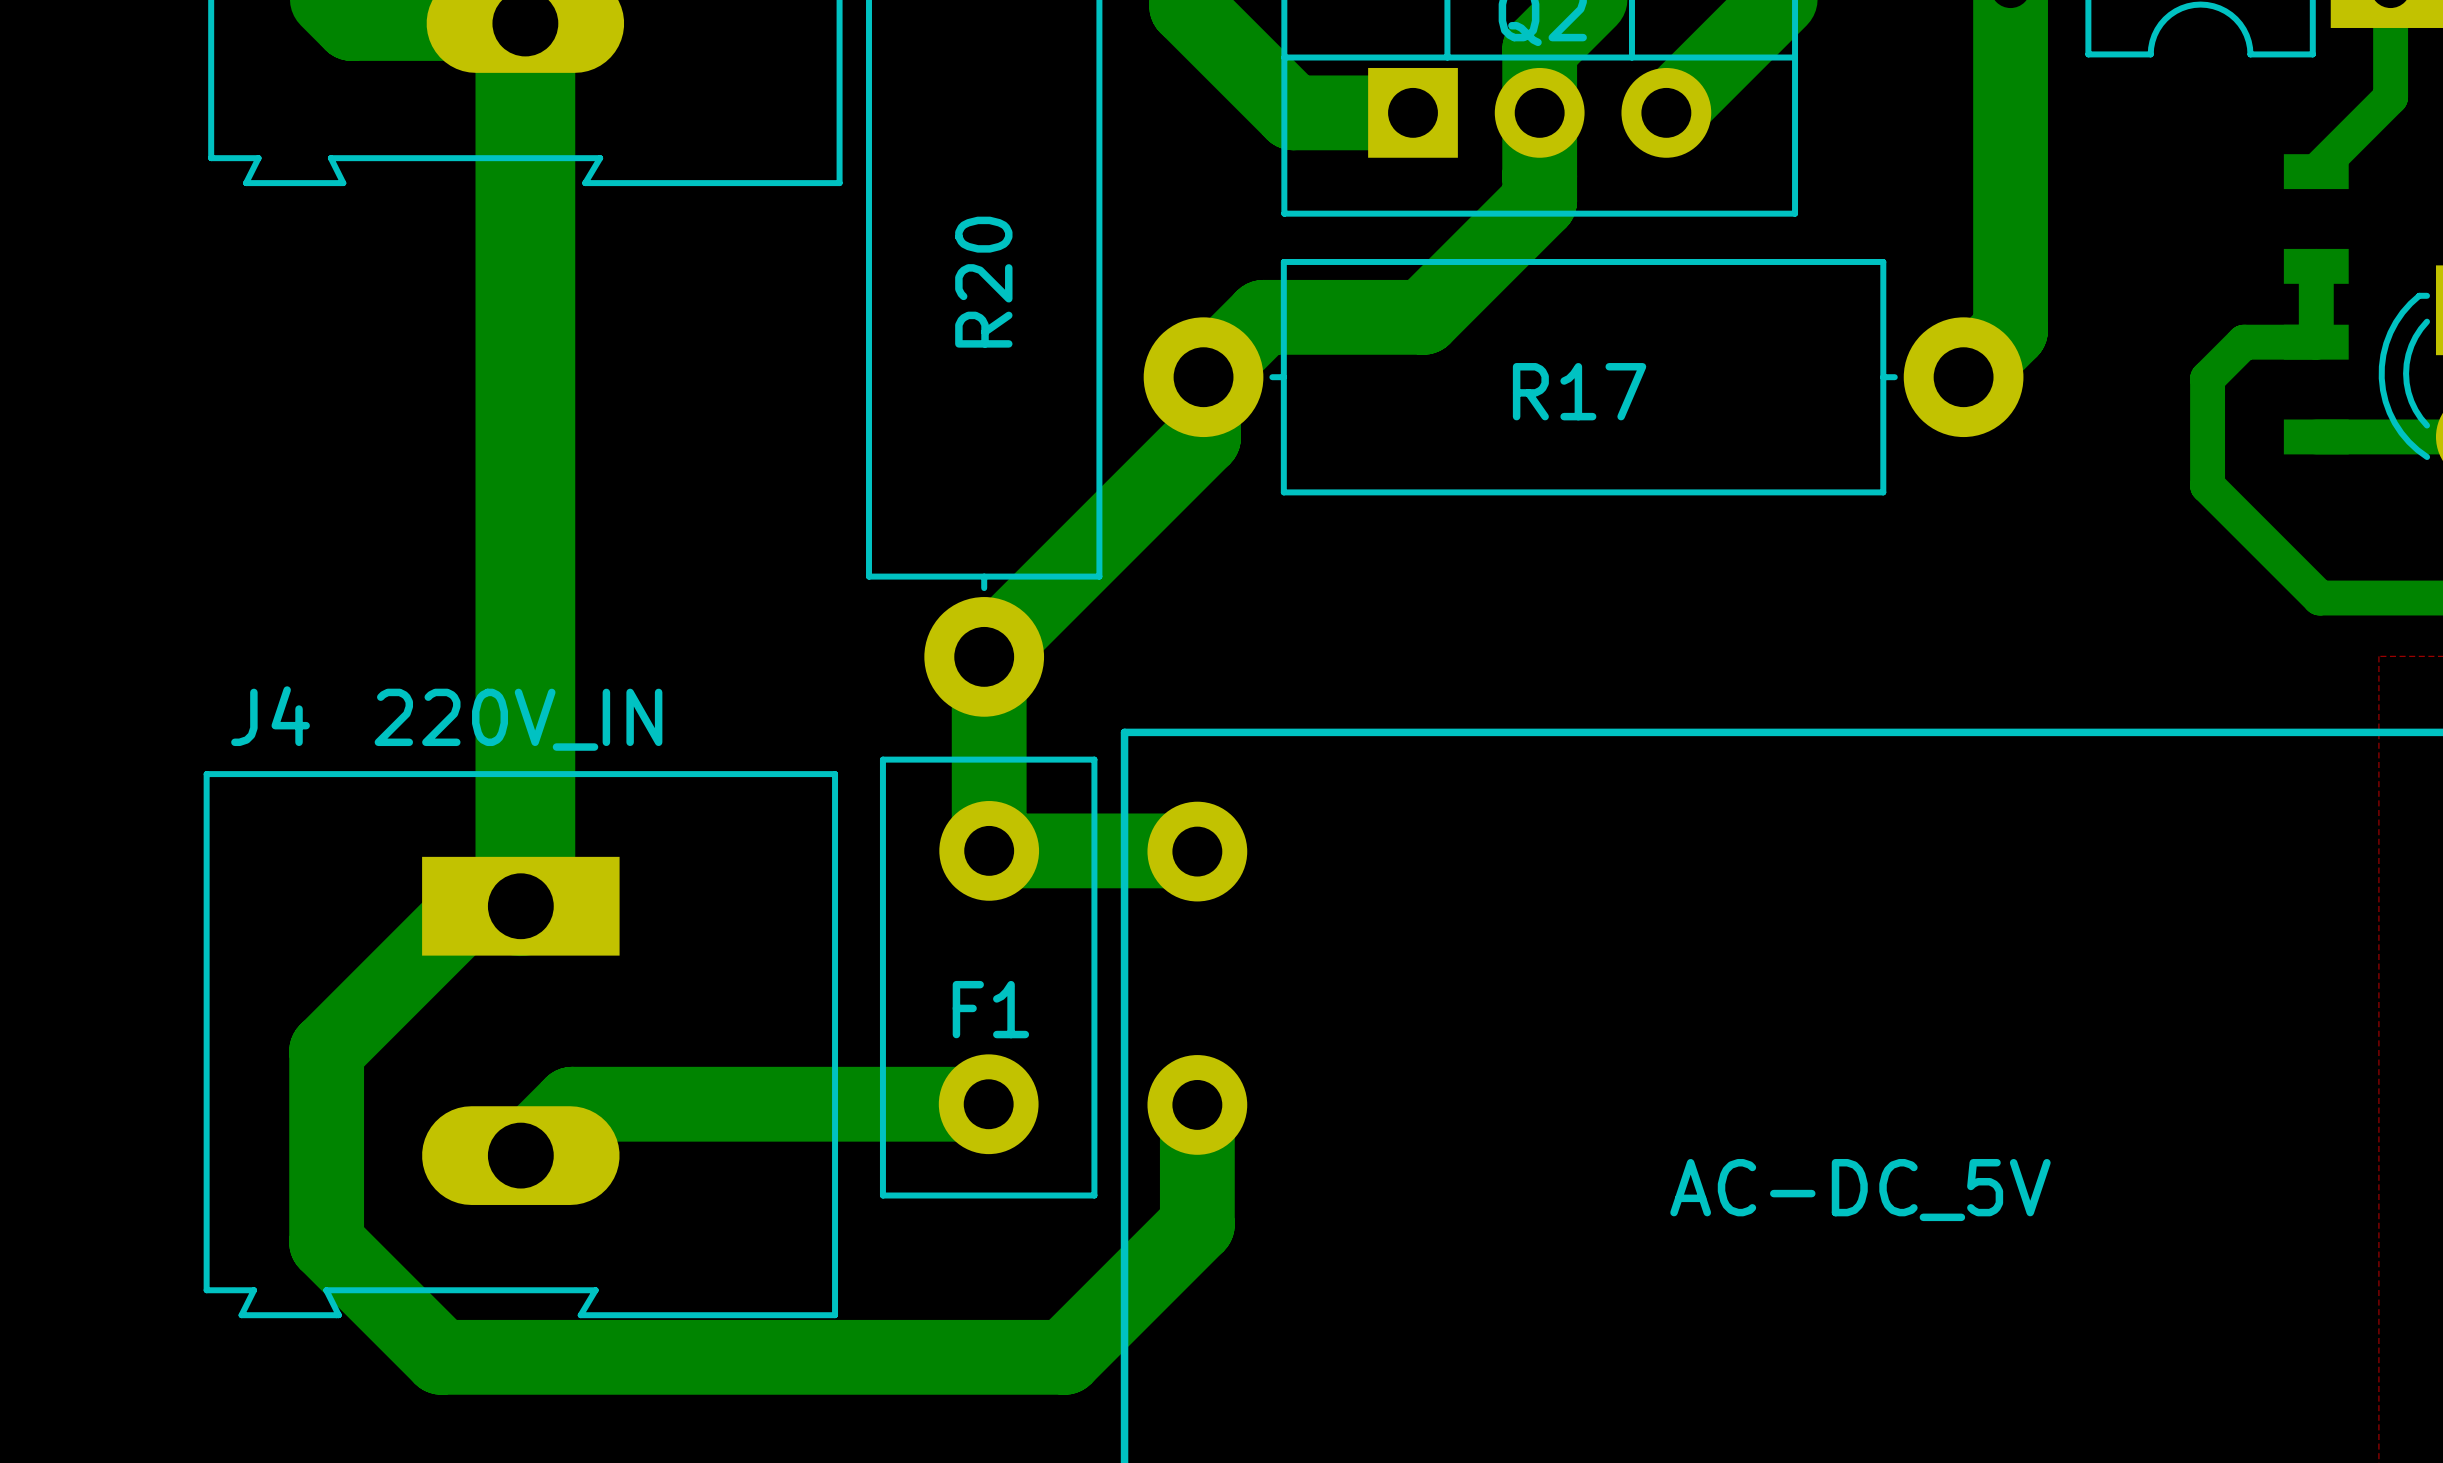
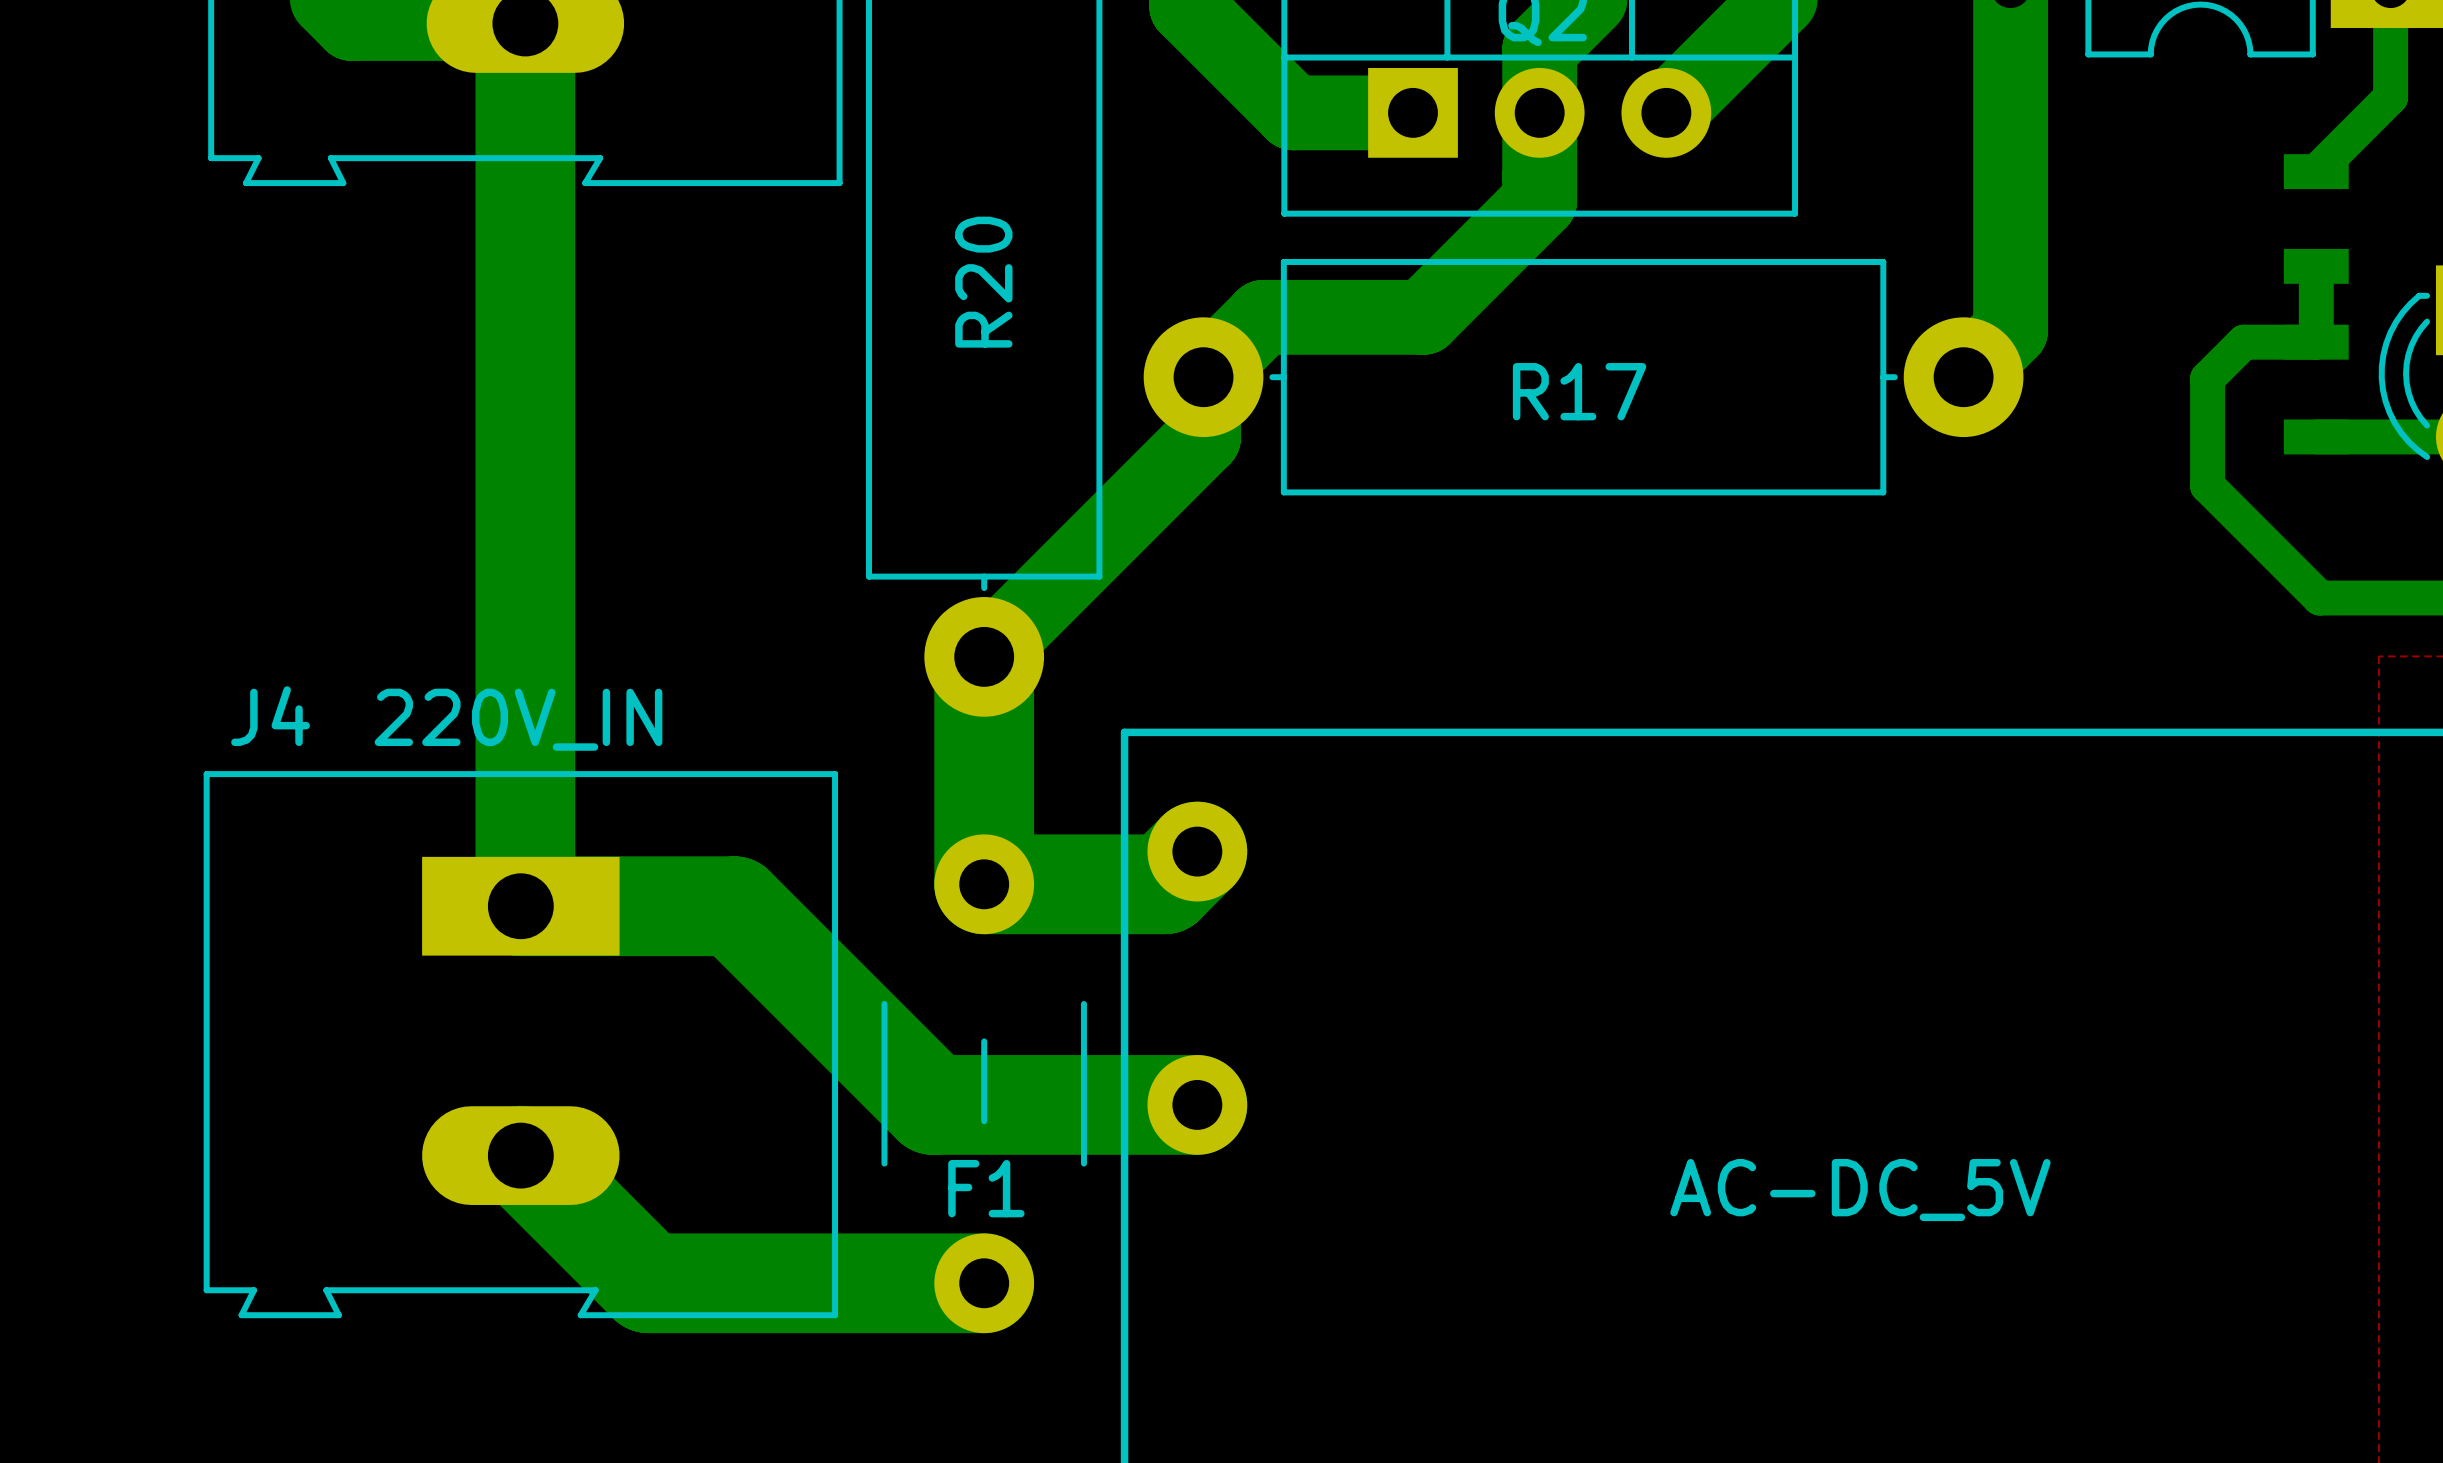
bottom track: (984, 656) (989, 661) (989, 850) (1196, 850) -> (984, 656) (984, 884) (1164, 884) (1197, 851)
F1 footprint: [879, 756, 1098, 1199] -> [881, 834, 1087, 1334]
bottom track: (520, 906) (471, 906) (326, 1051) (326, 1242) (441, 1357) (1064, 1357) (1197, 1224) (1197, 1104) -> (520, 906) (734, 906) (933, 1104) (1197, 1104)
bottom track: (988, 1104) (572, 1104) (520, 1155) -> (984, 1283) (648, 1283) (520, 1155)

